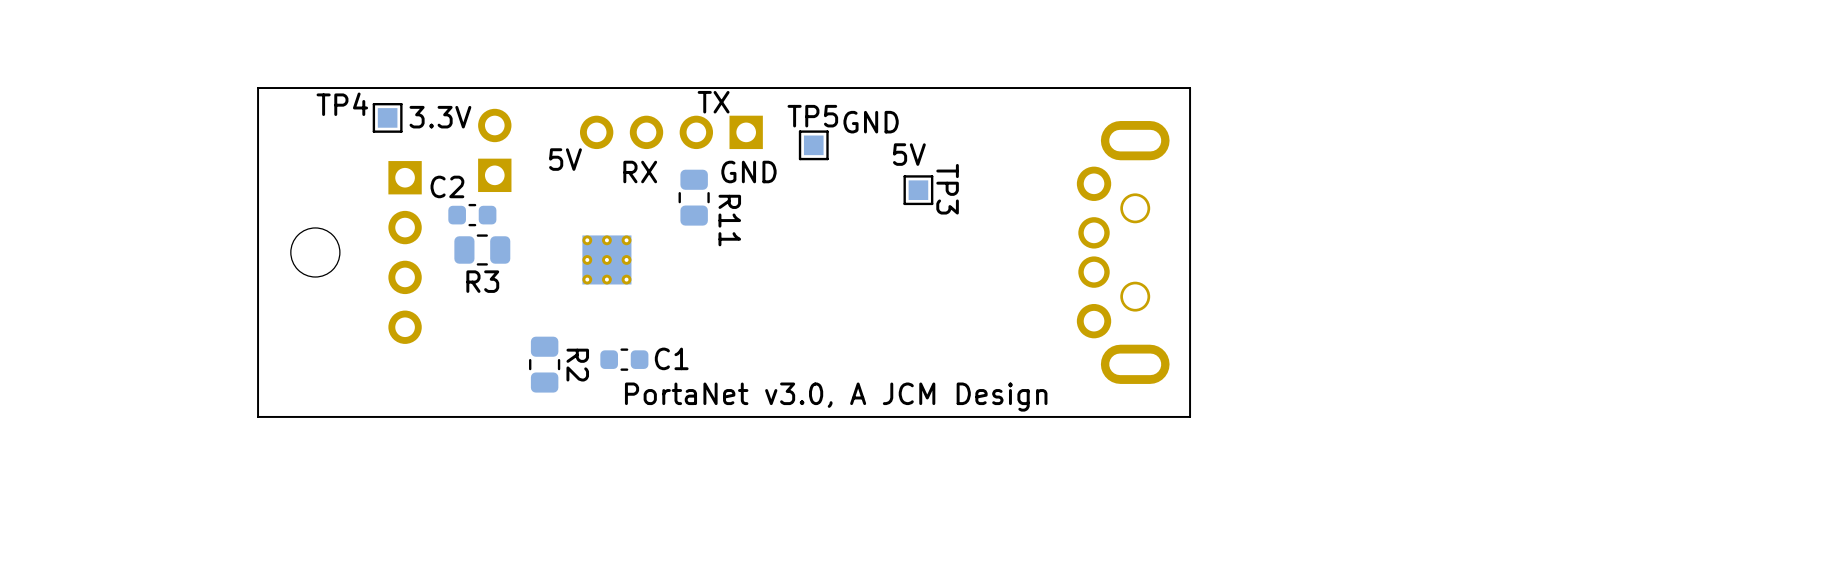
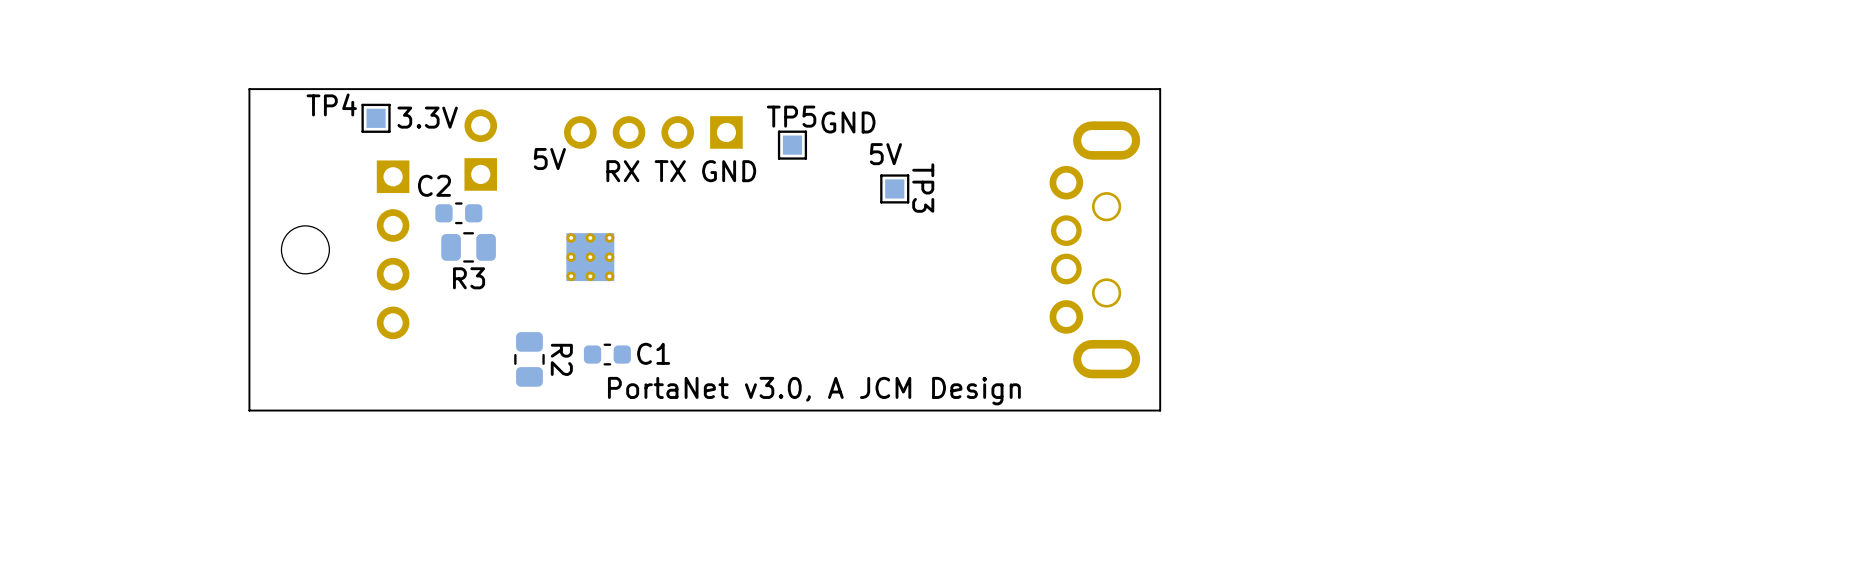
text position: TX (713, 102) -> TX (670, 171)
R11: (694, 197) -> none

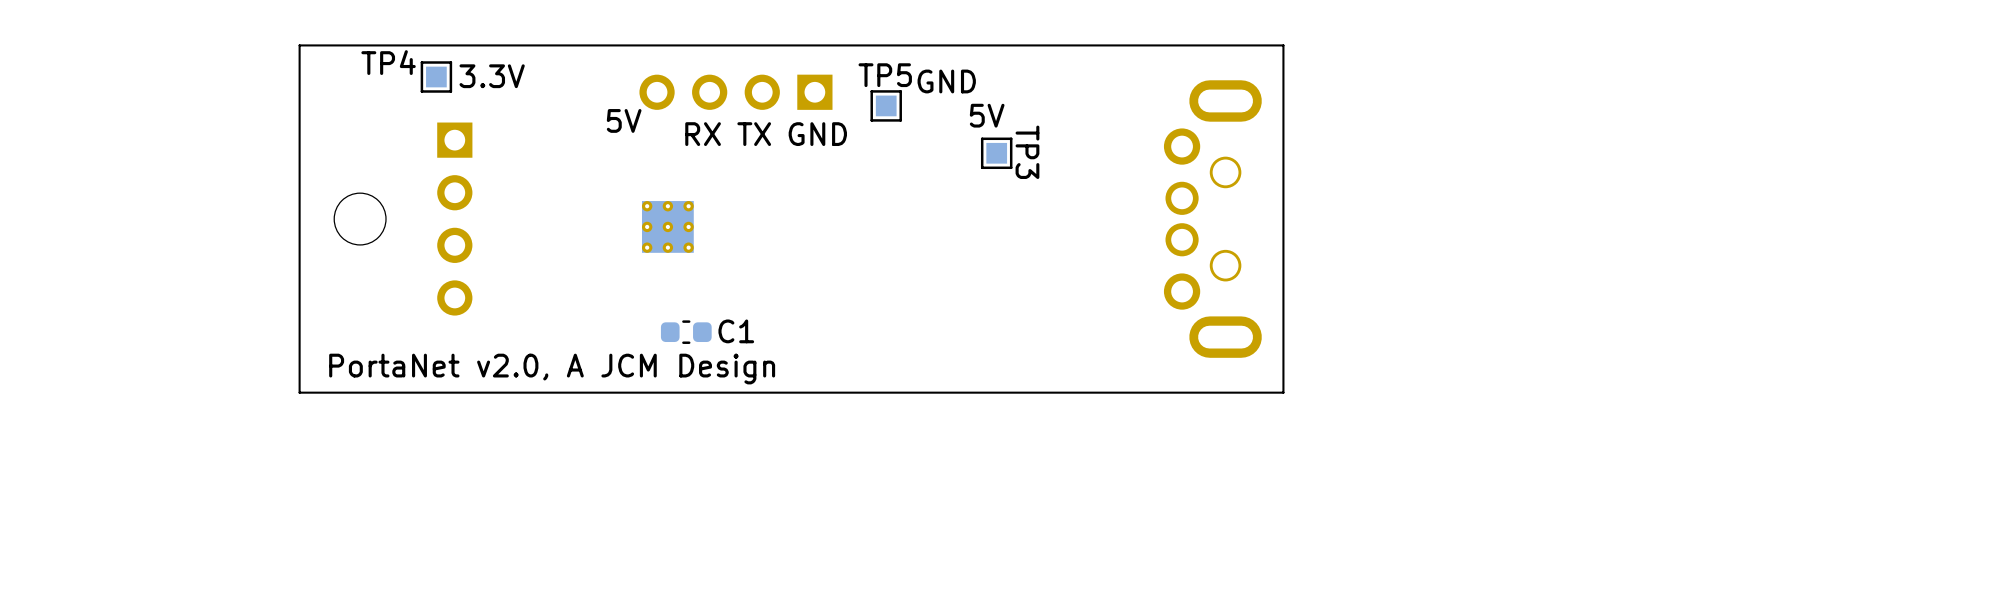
part: (480, 150) -> none
C2: (458, 213) -> none
R3: (468, 247) -> none
R2: (529, 359) -> none
text: PortaNet v3.0, A JCM Design (814, 391) -> PortaNet v2.0, A JCM Design (552, 369)

